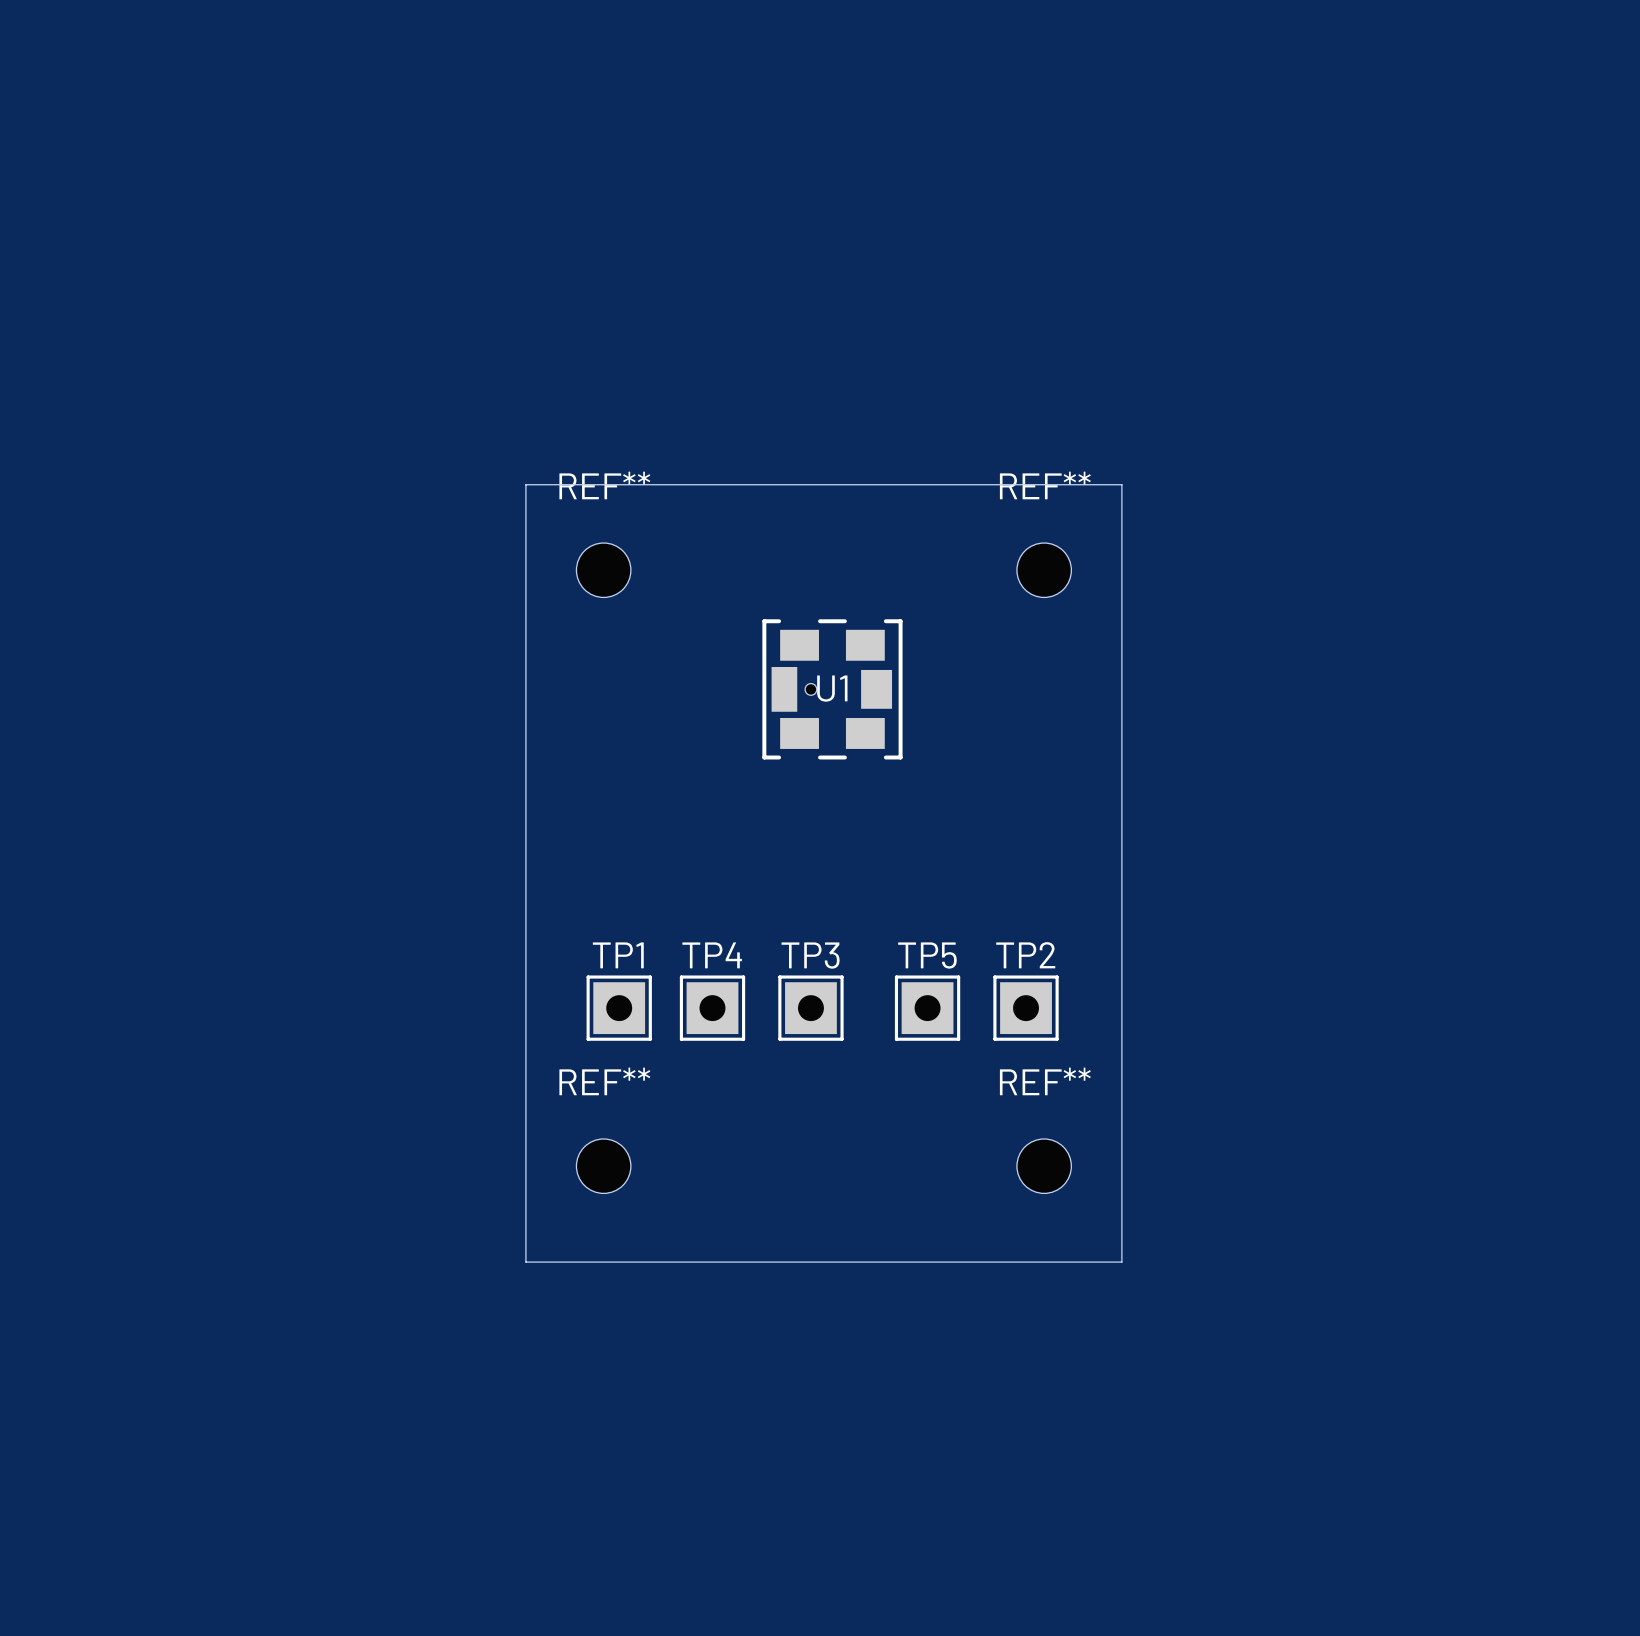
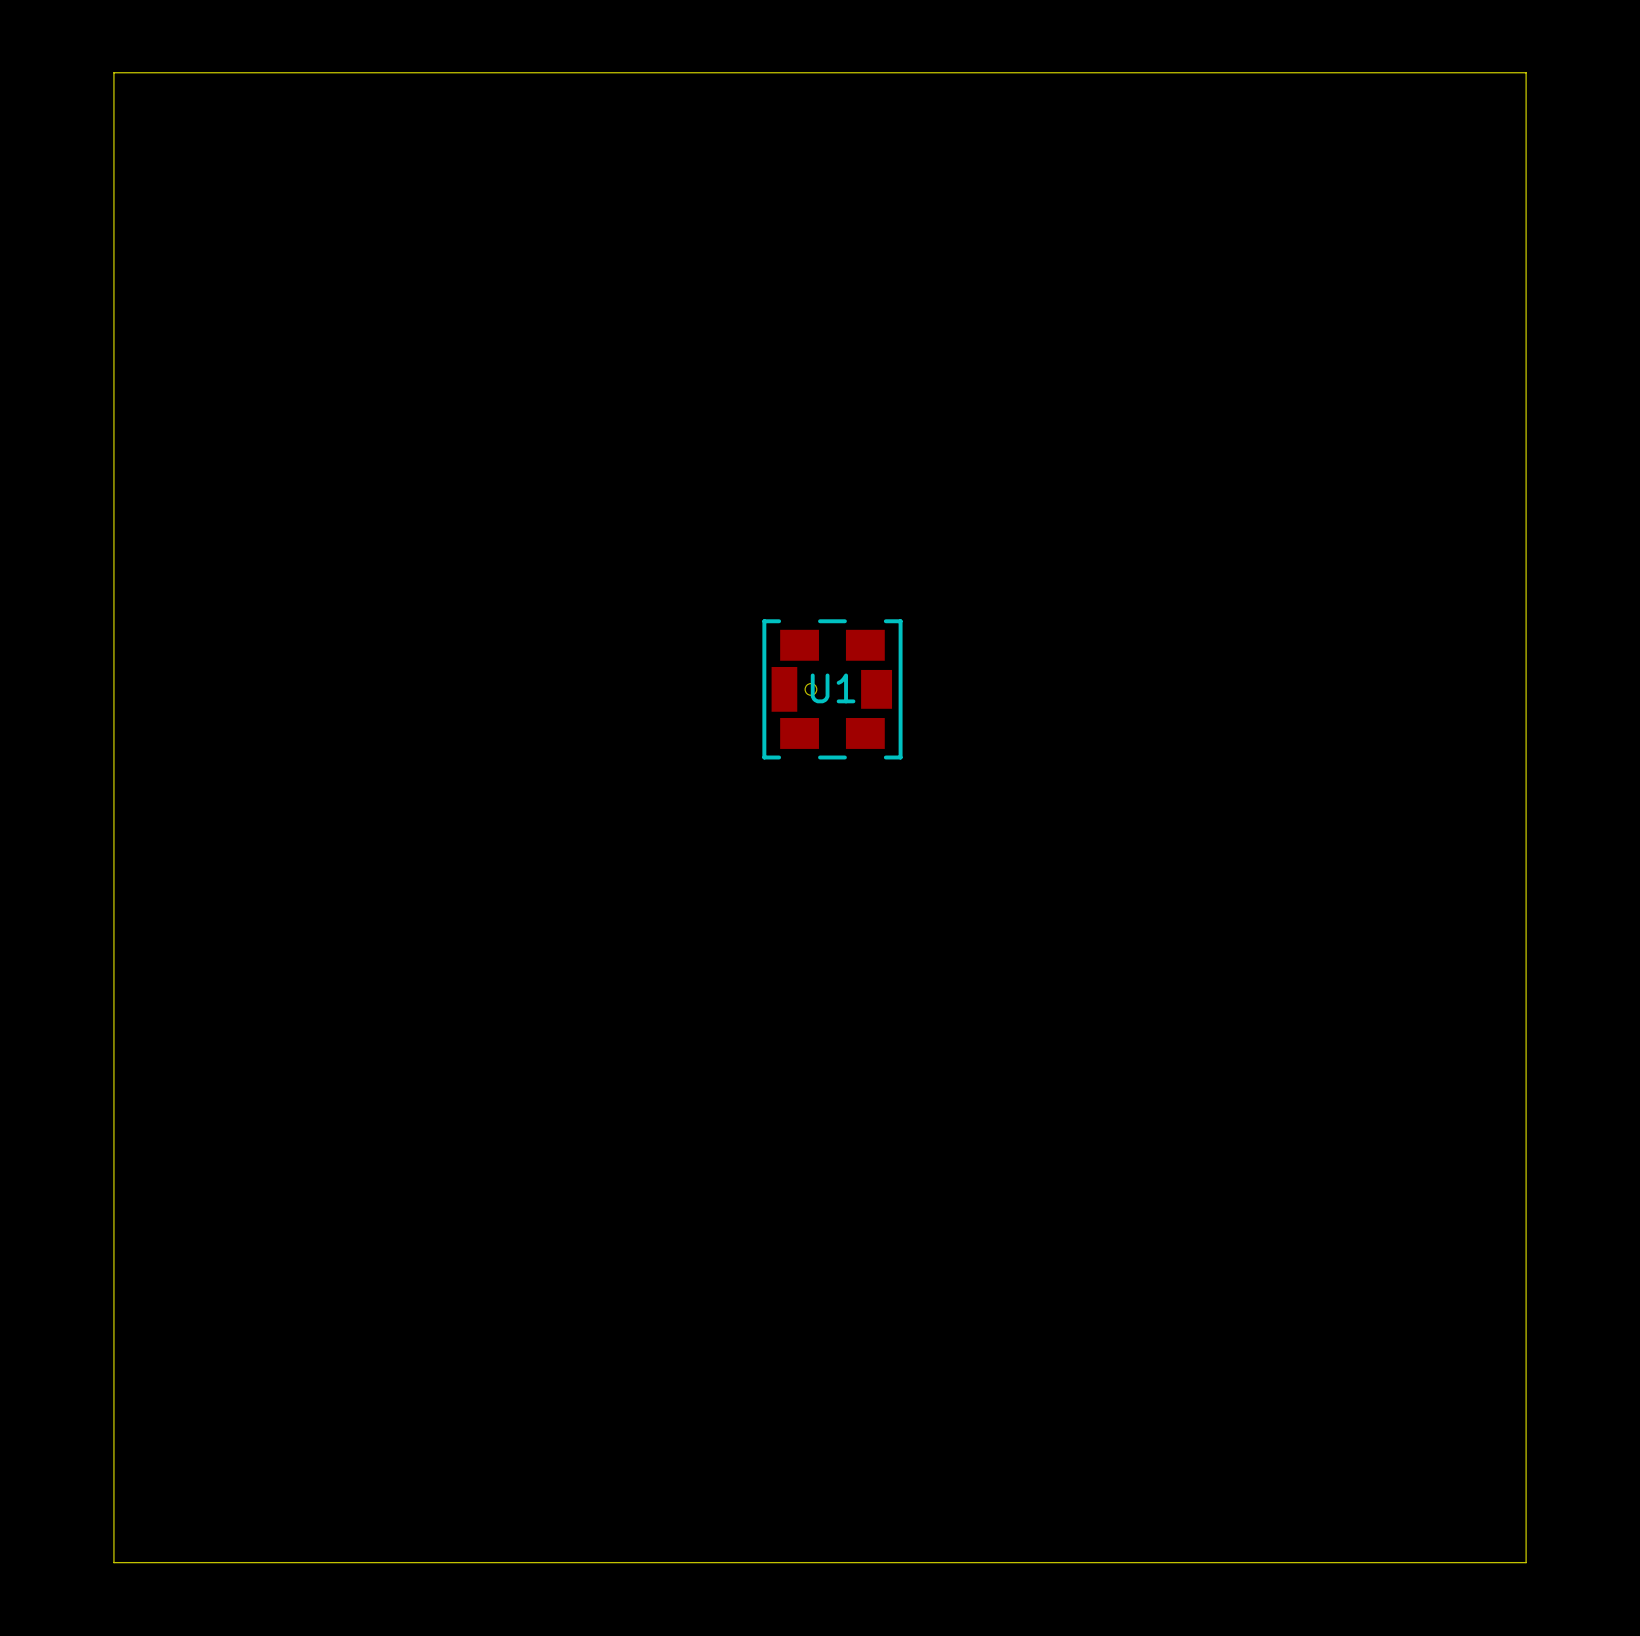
board edge: none -> (113, 72) (1526, 72) (1526, 1562) (113, 1562) (113, 72)
board edge: (525, 484) (1121, 484) (1121, 1262) (525, 1262) (525, 484) -> none
REF**: (603, 570) -> none
REF**: (1044, 570) -> none
TP1: (619, 1008) -> none
TP4: (712, 1008) -> none
TP3: (810, 1008) -> none
TP5: (927, 1008) -> none
TP2: (1026, 1008) -> none
REF**: (603, 1166) -> none
REF**: (1044, 1166) -> none

